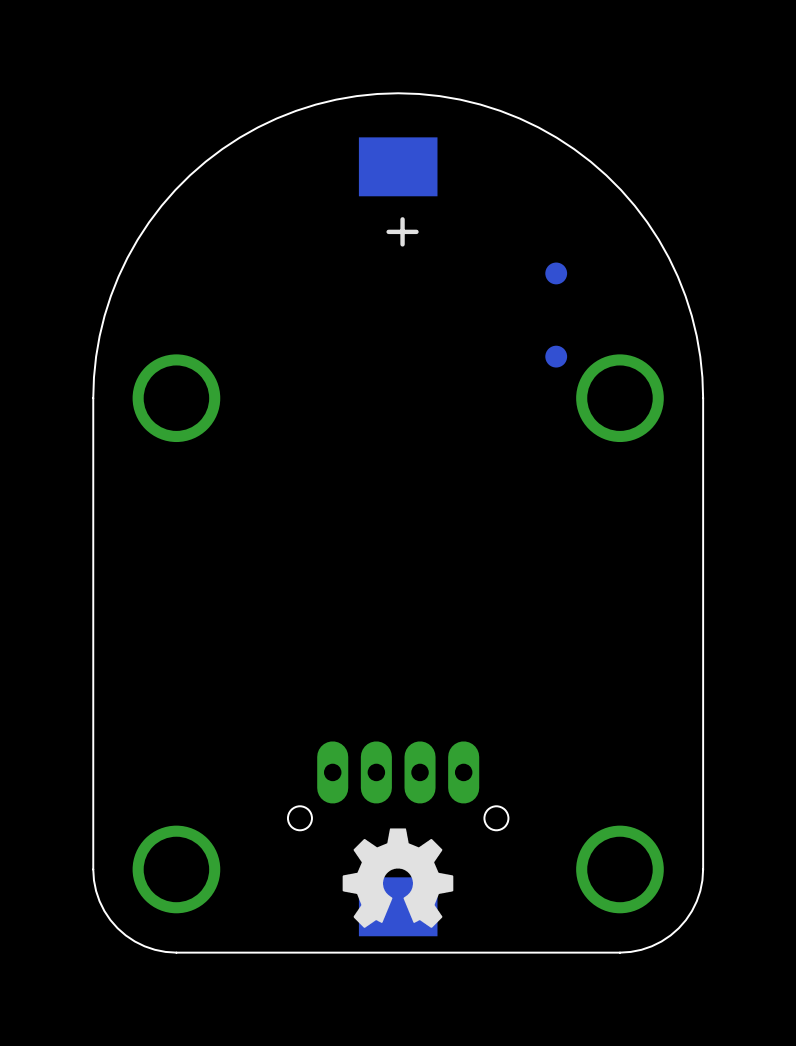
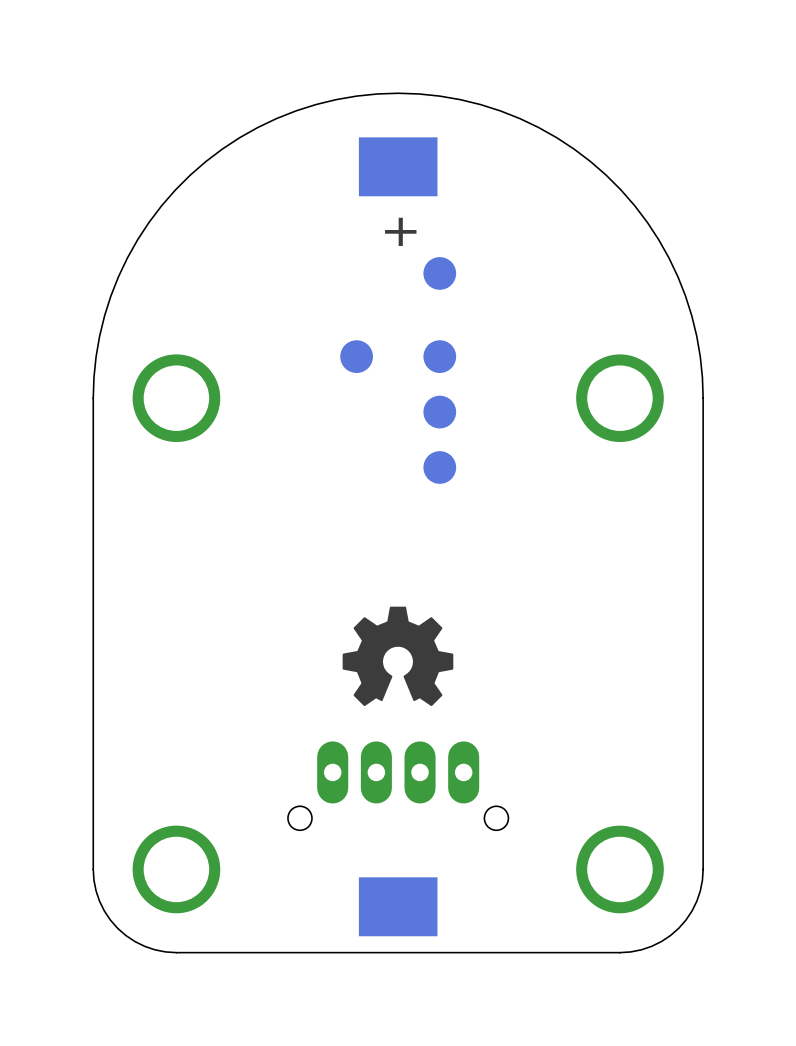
part: none -> (439, 273)
part: (556, 273) -> none
part: none -> (356, 356)
part: none -> (439, 356)
part: (556, 356) -> none
part: none -> (439, 412)
part: none -> (439, 467)
drawing position: (397, 878) -> (397, 656)

